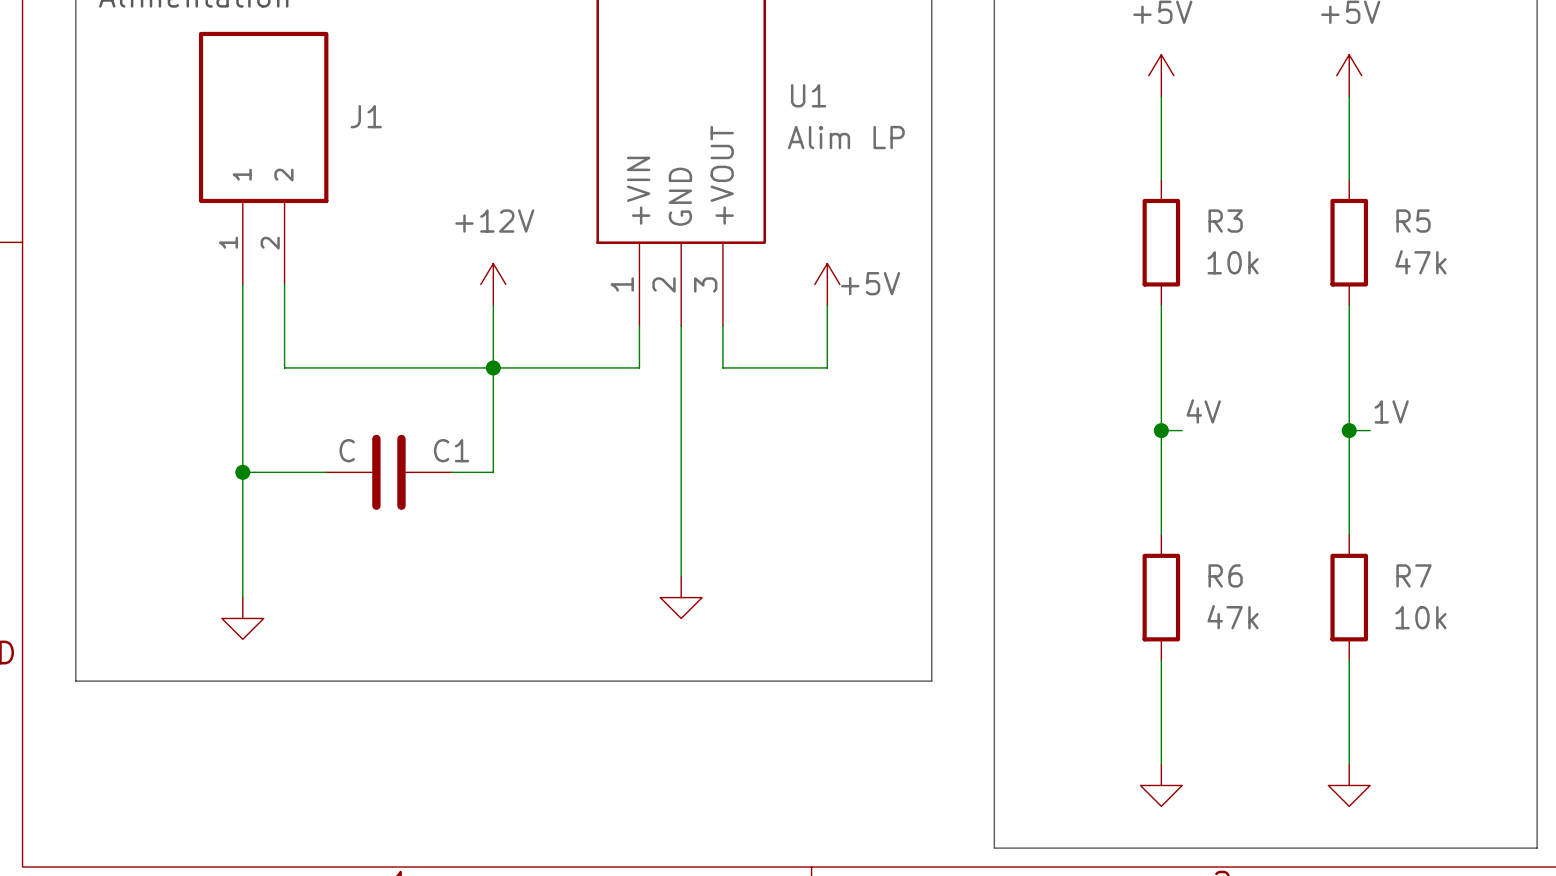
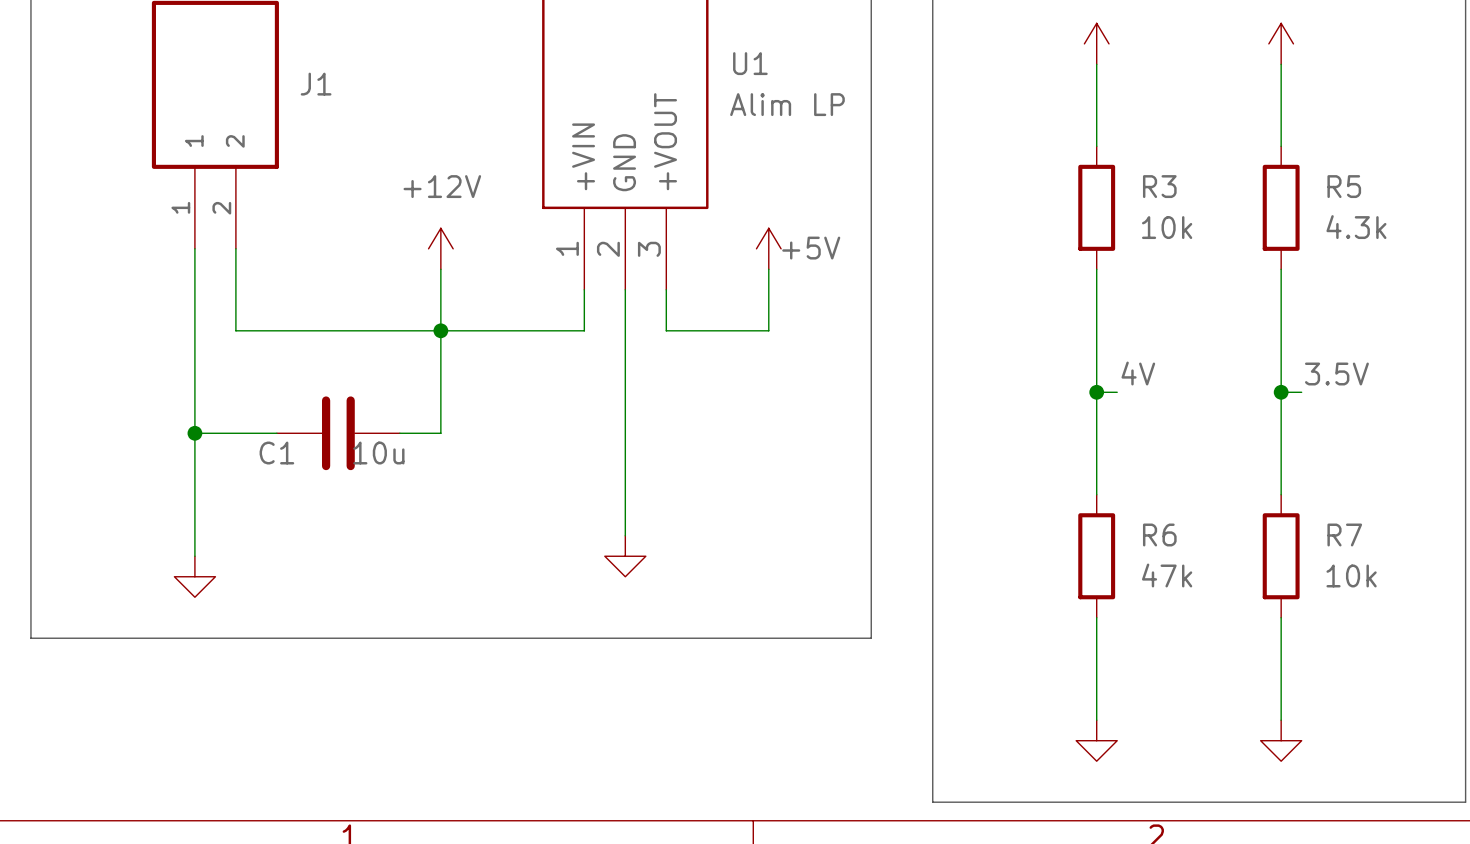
R5 value: 47k (1420, 262) -> 4.3k (1356, 227)
label: 1V (1391, 411) -> 3.5V (1336, 374)
C1 value: C (347, 450) -> 10u (378, 453)
C1 name position: C1 (451, 450) -> C1 (276, 453)

